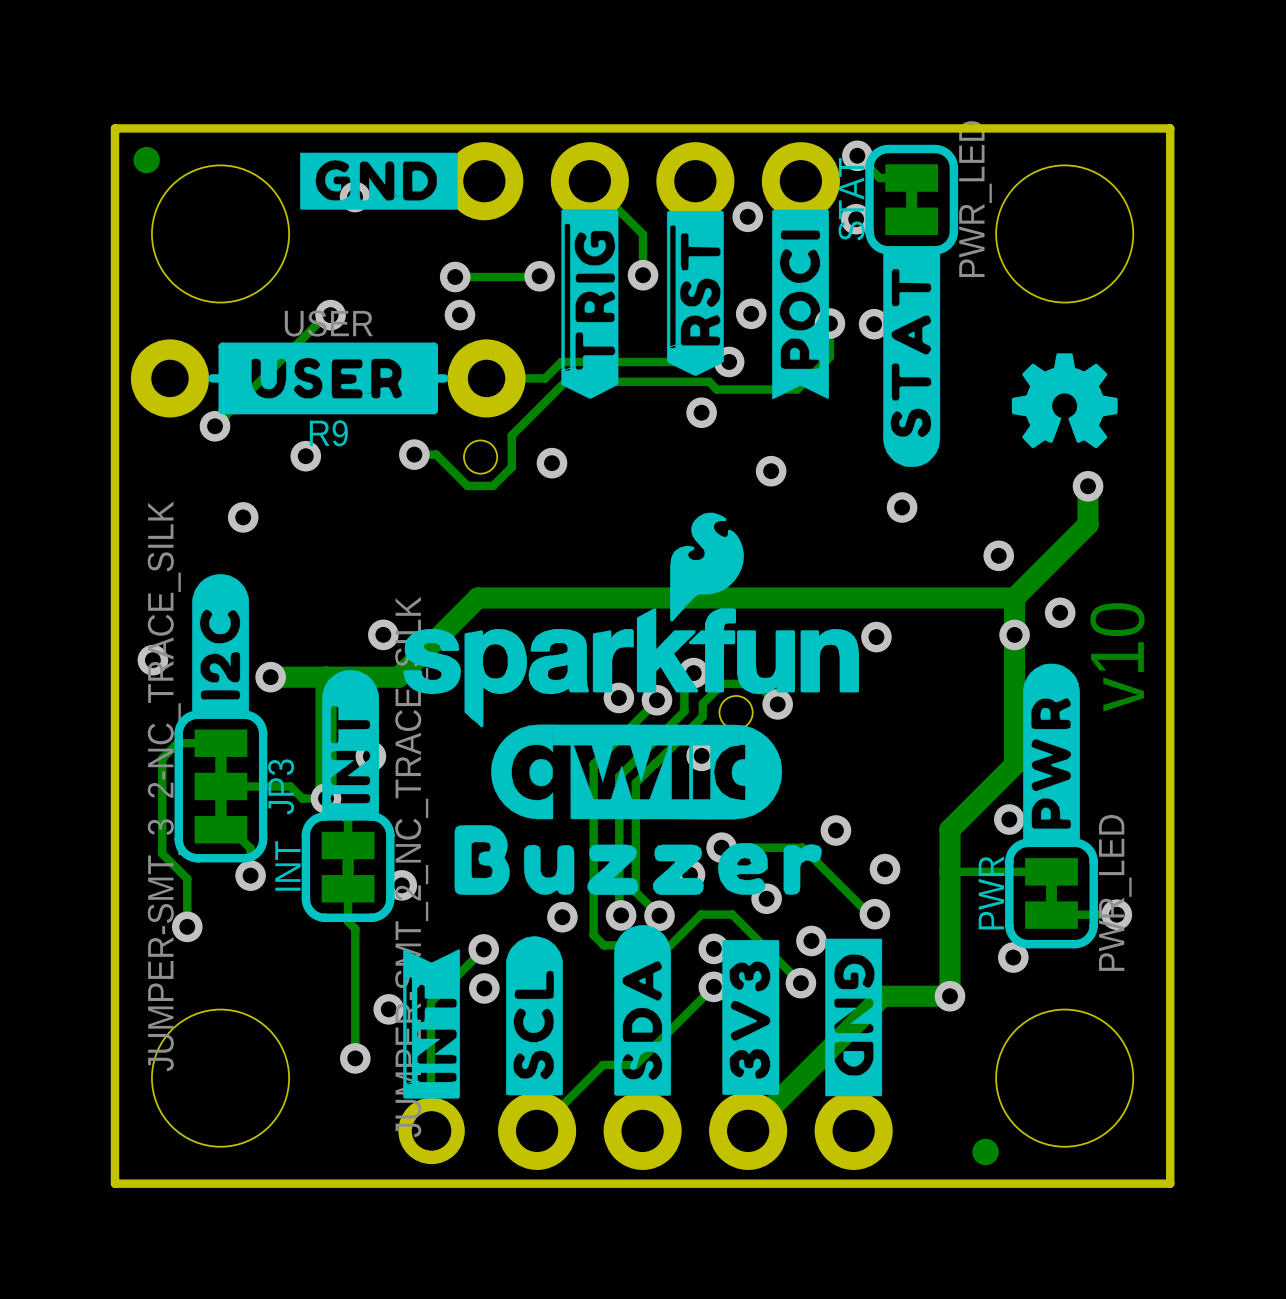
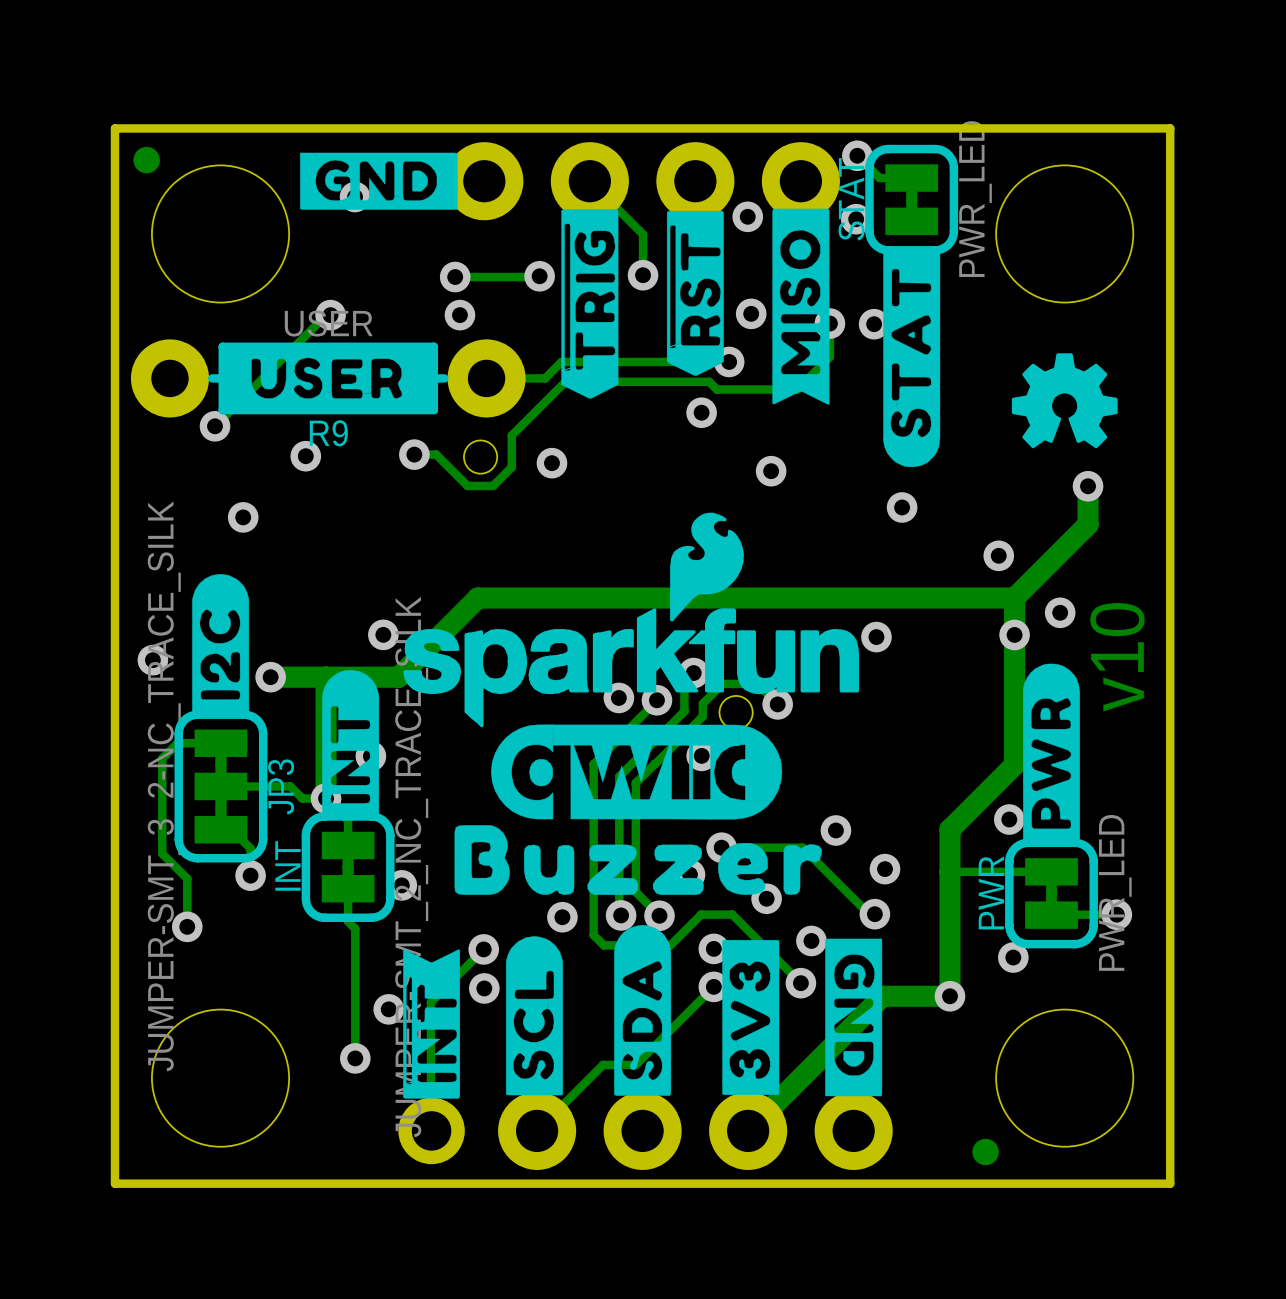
drawing shape: [772, 209, 830, 400] -> [772, 208, 830, 405]

